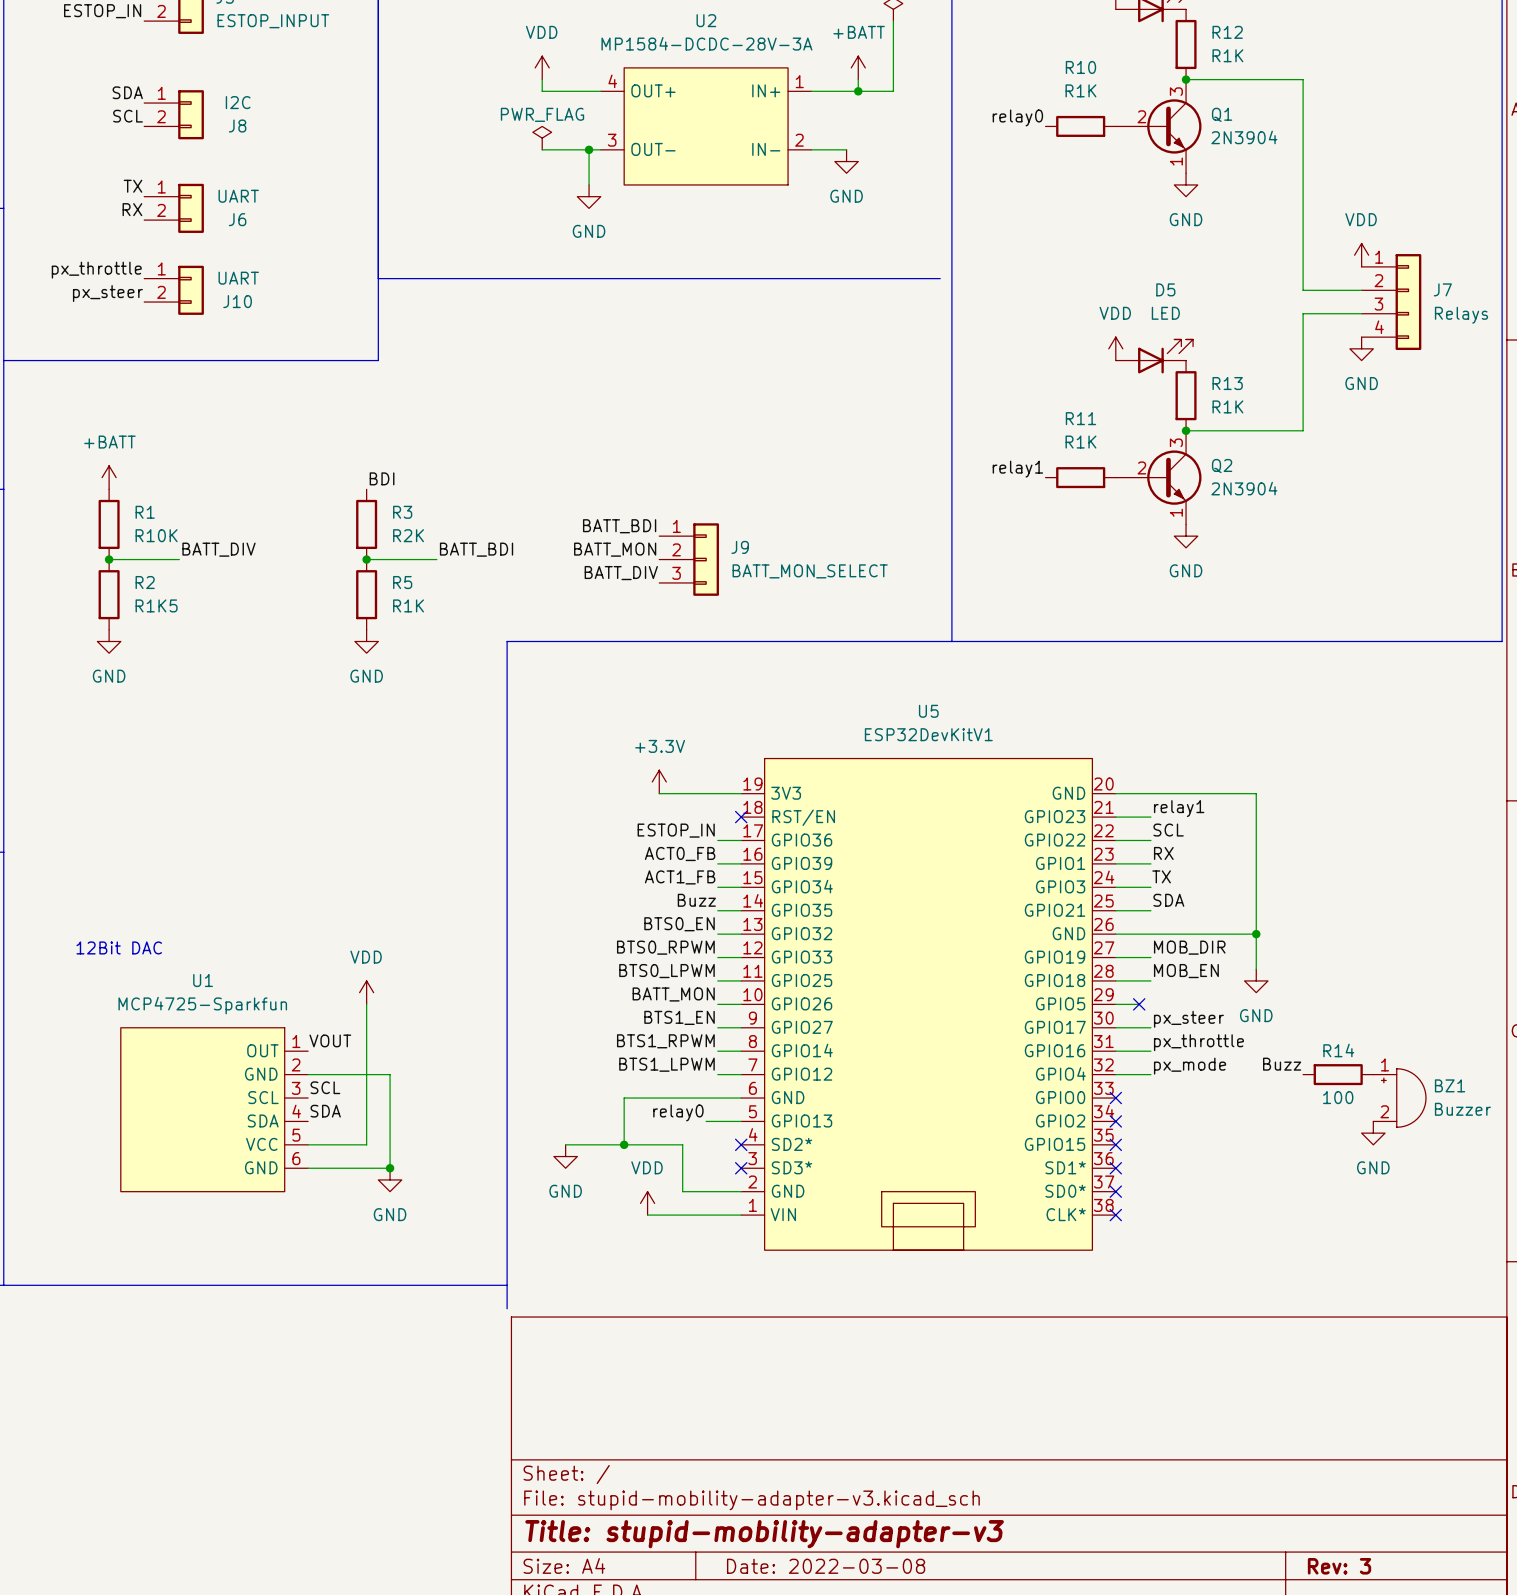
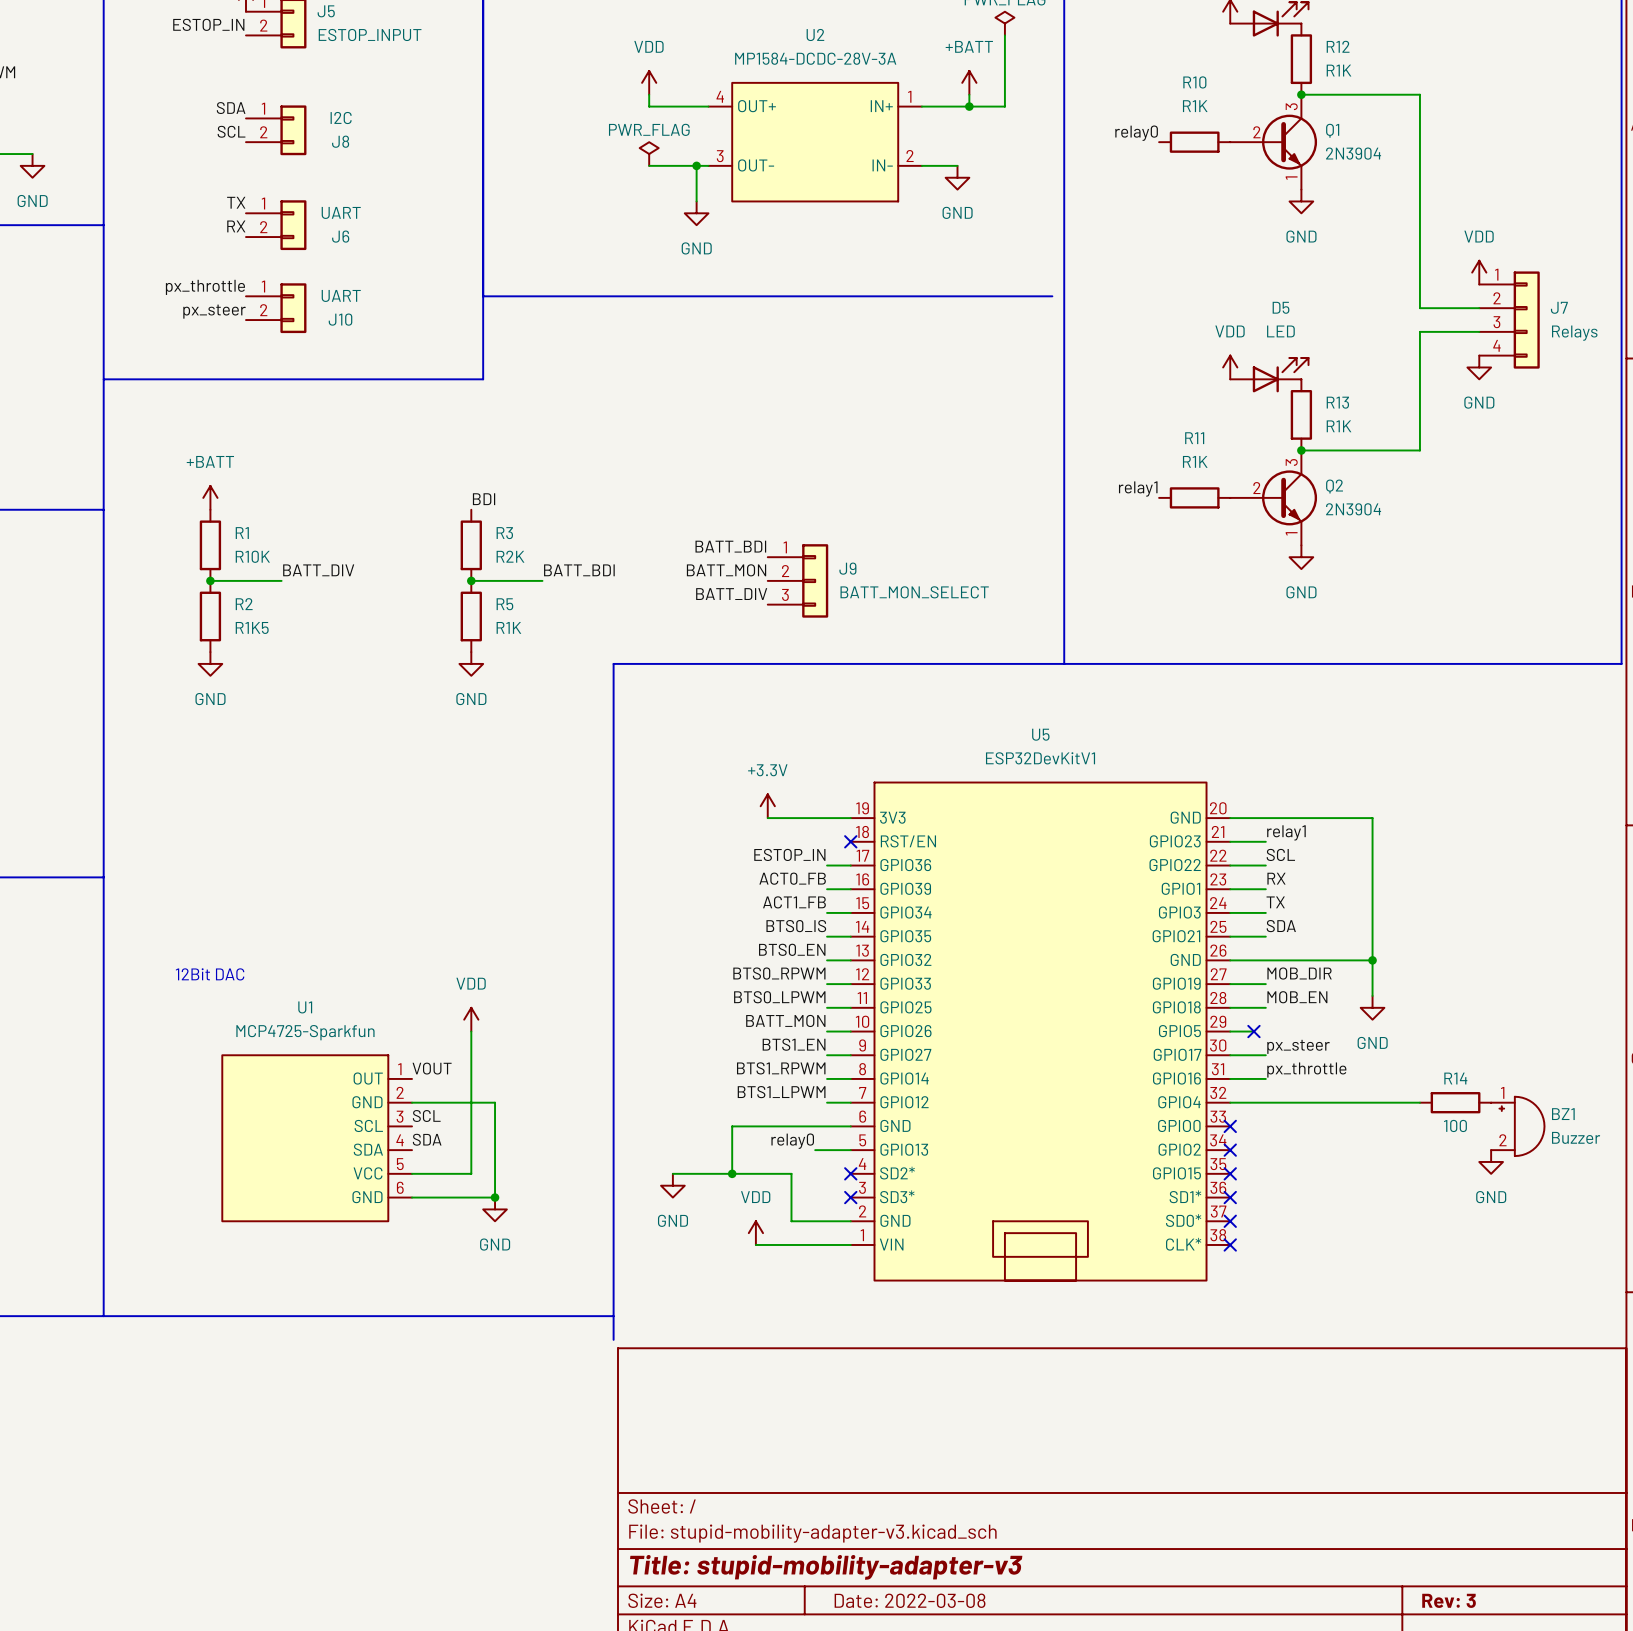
label: Buzz (696, 900) -> BTS0_IS (796, 926)
label: Buzz (1282, 1064) -> none
label: px_mode (1190, 1066) -> none
wire: none -> (1265, 1102) (1419, 1102)

